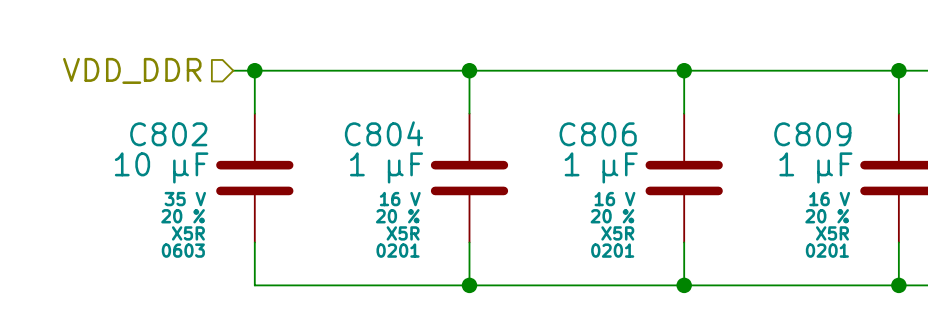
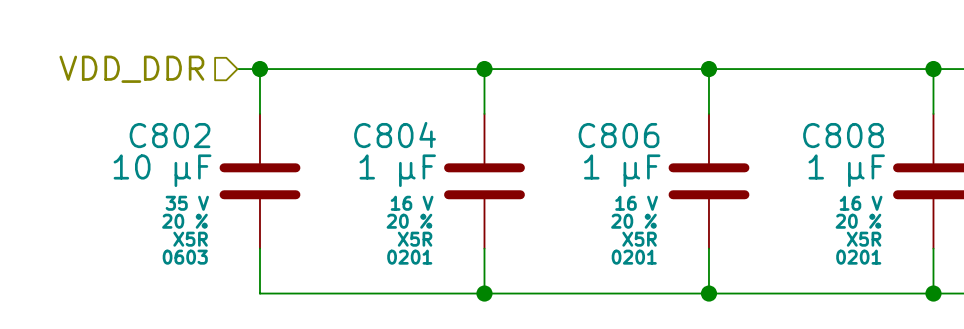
C809 name: C809 (812, 134) -> C808 (843, 135)

